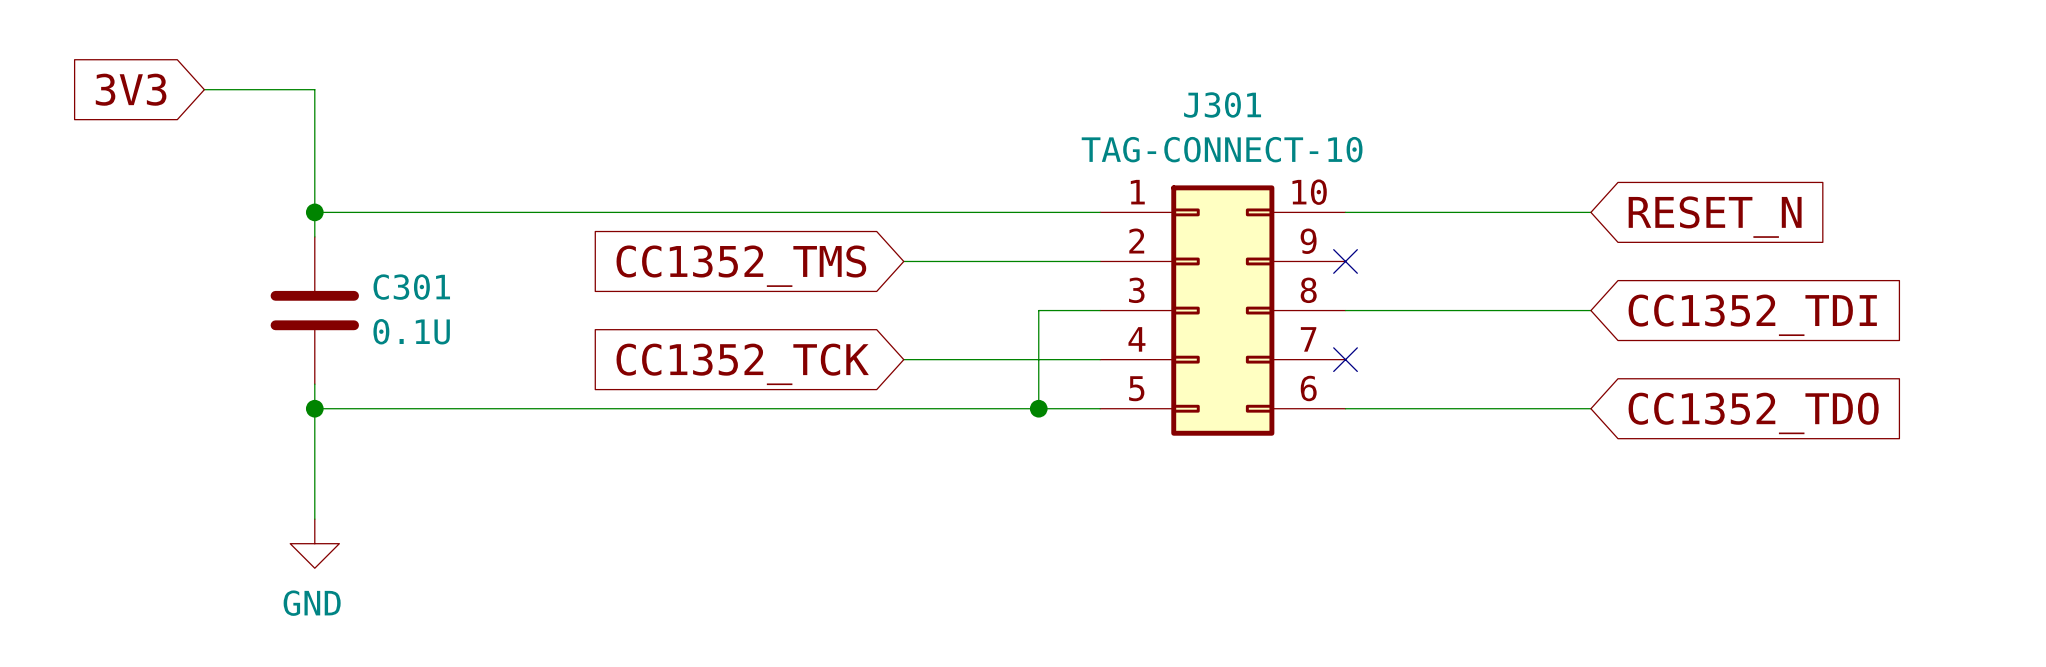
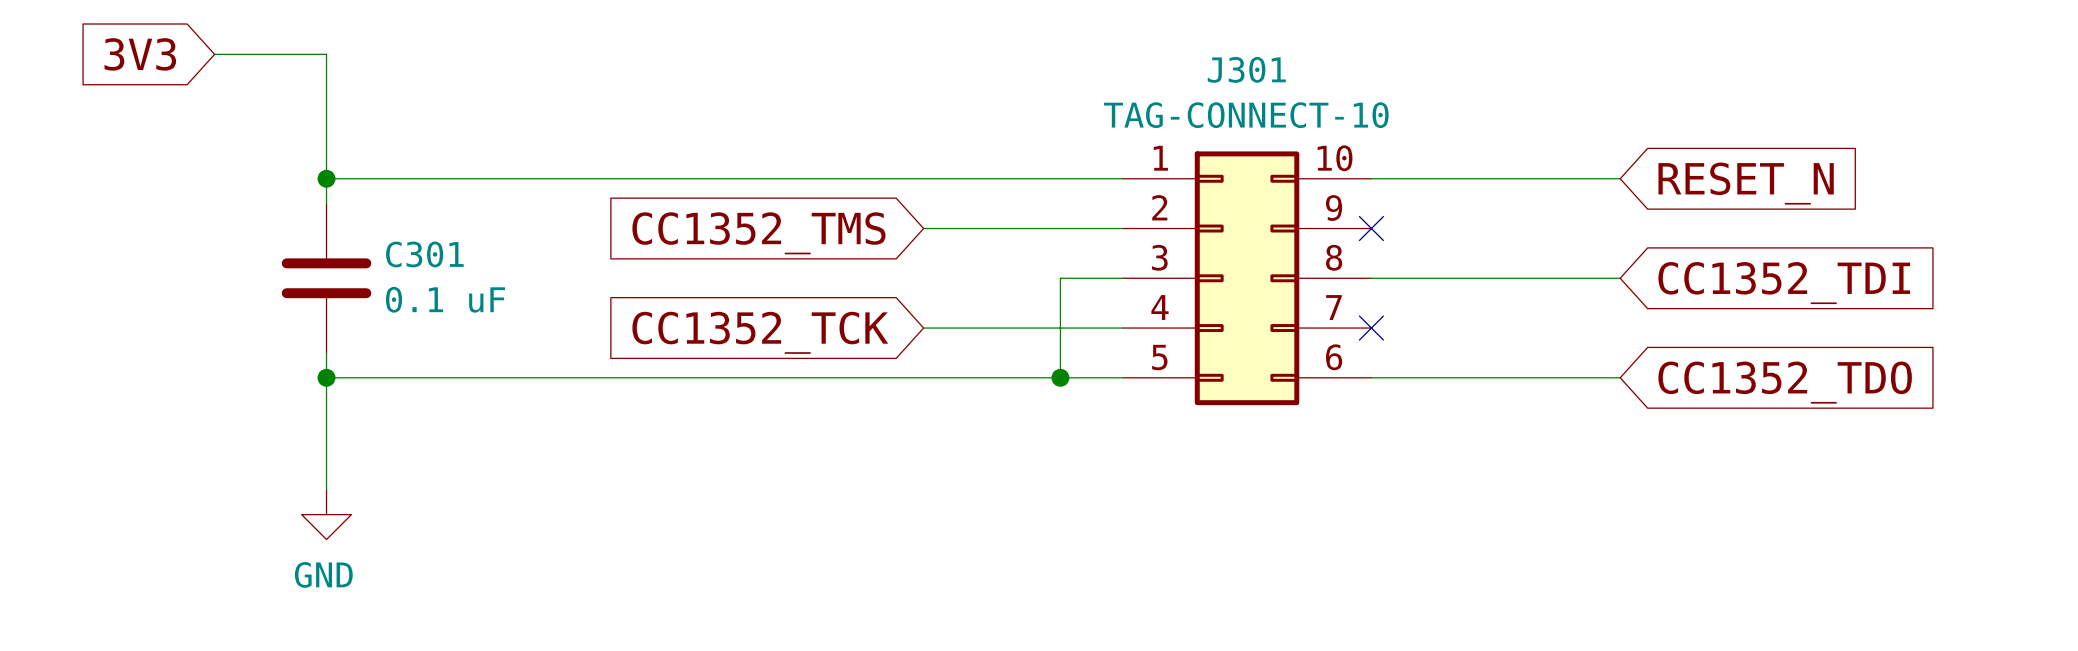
C301 value: 0.1U (411, 331) -> 0.1 uF (445, 299)

